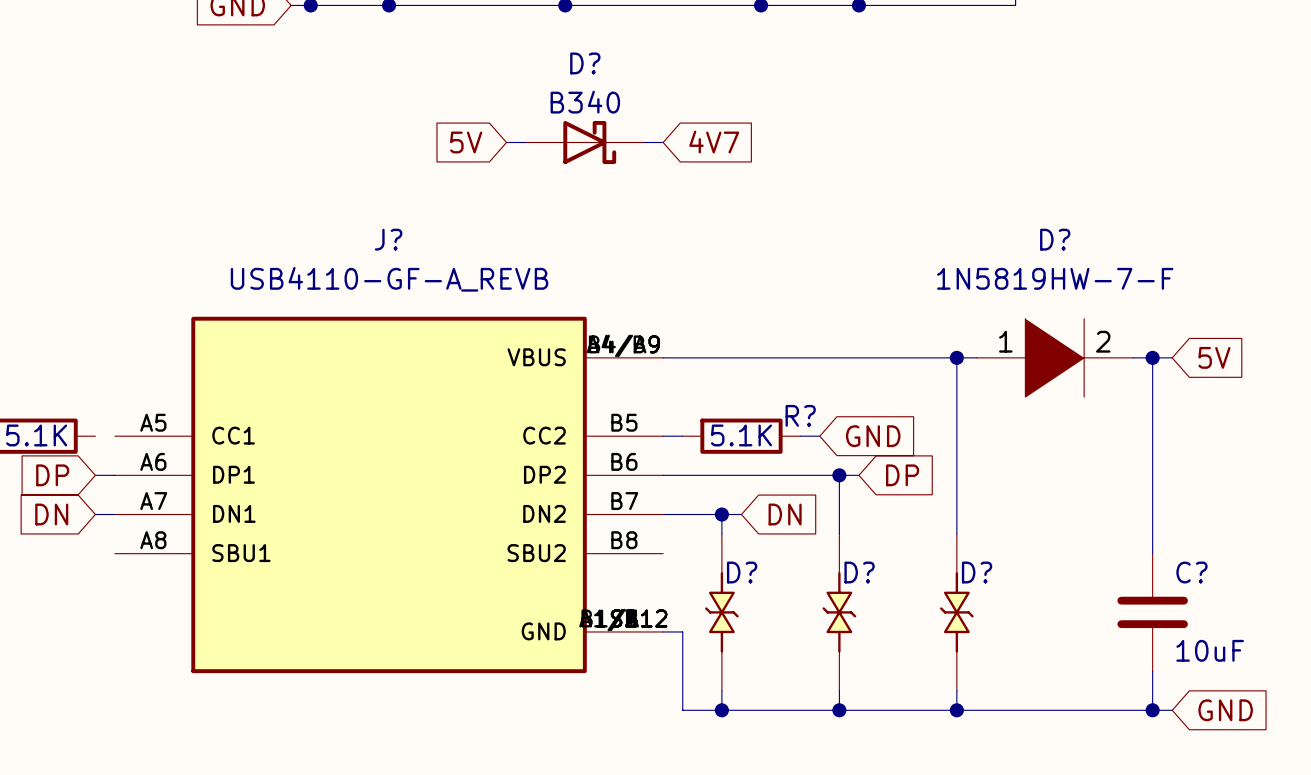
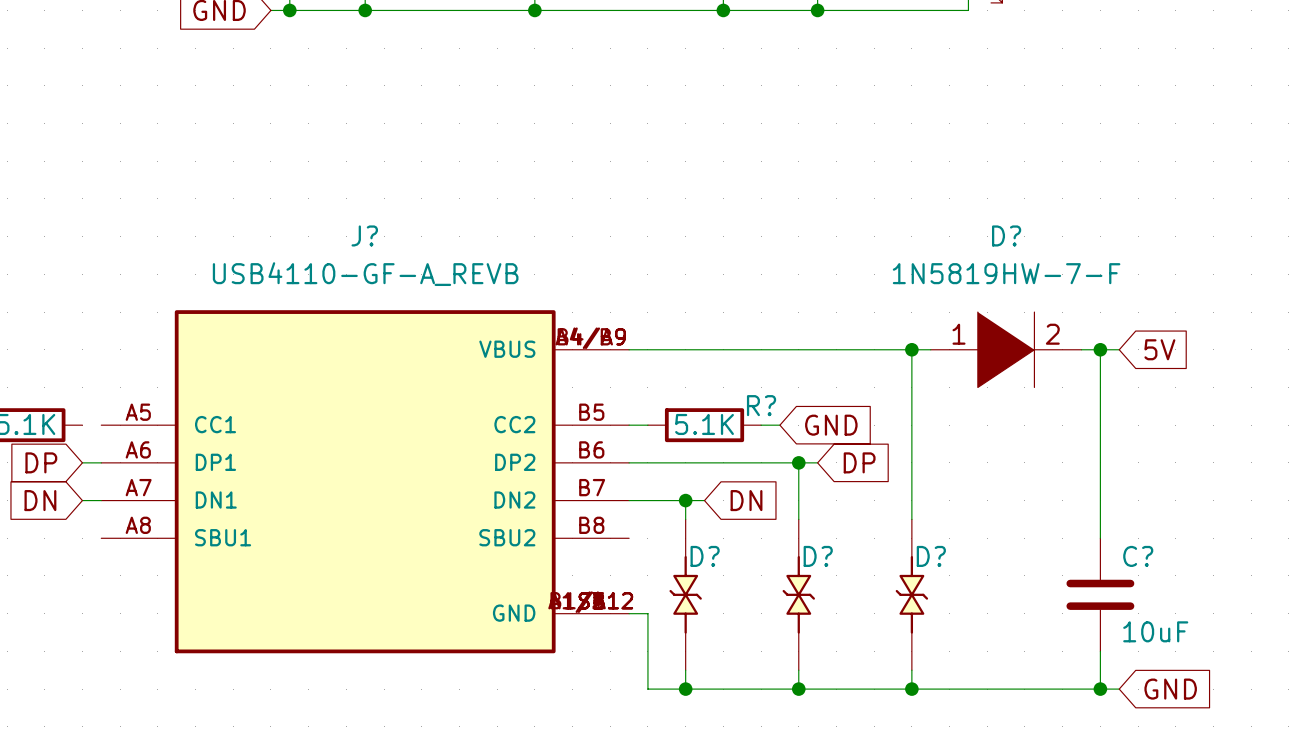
global label: 5V (466, 142) -> none
wire: (506, 142) (526, 142) -> none
D?: B340 (584, 142) -> none
wire: (643, 142) (663, 142) -> none
global label: 4V7 (714, 142) -> none

